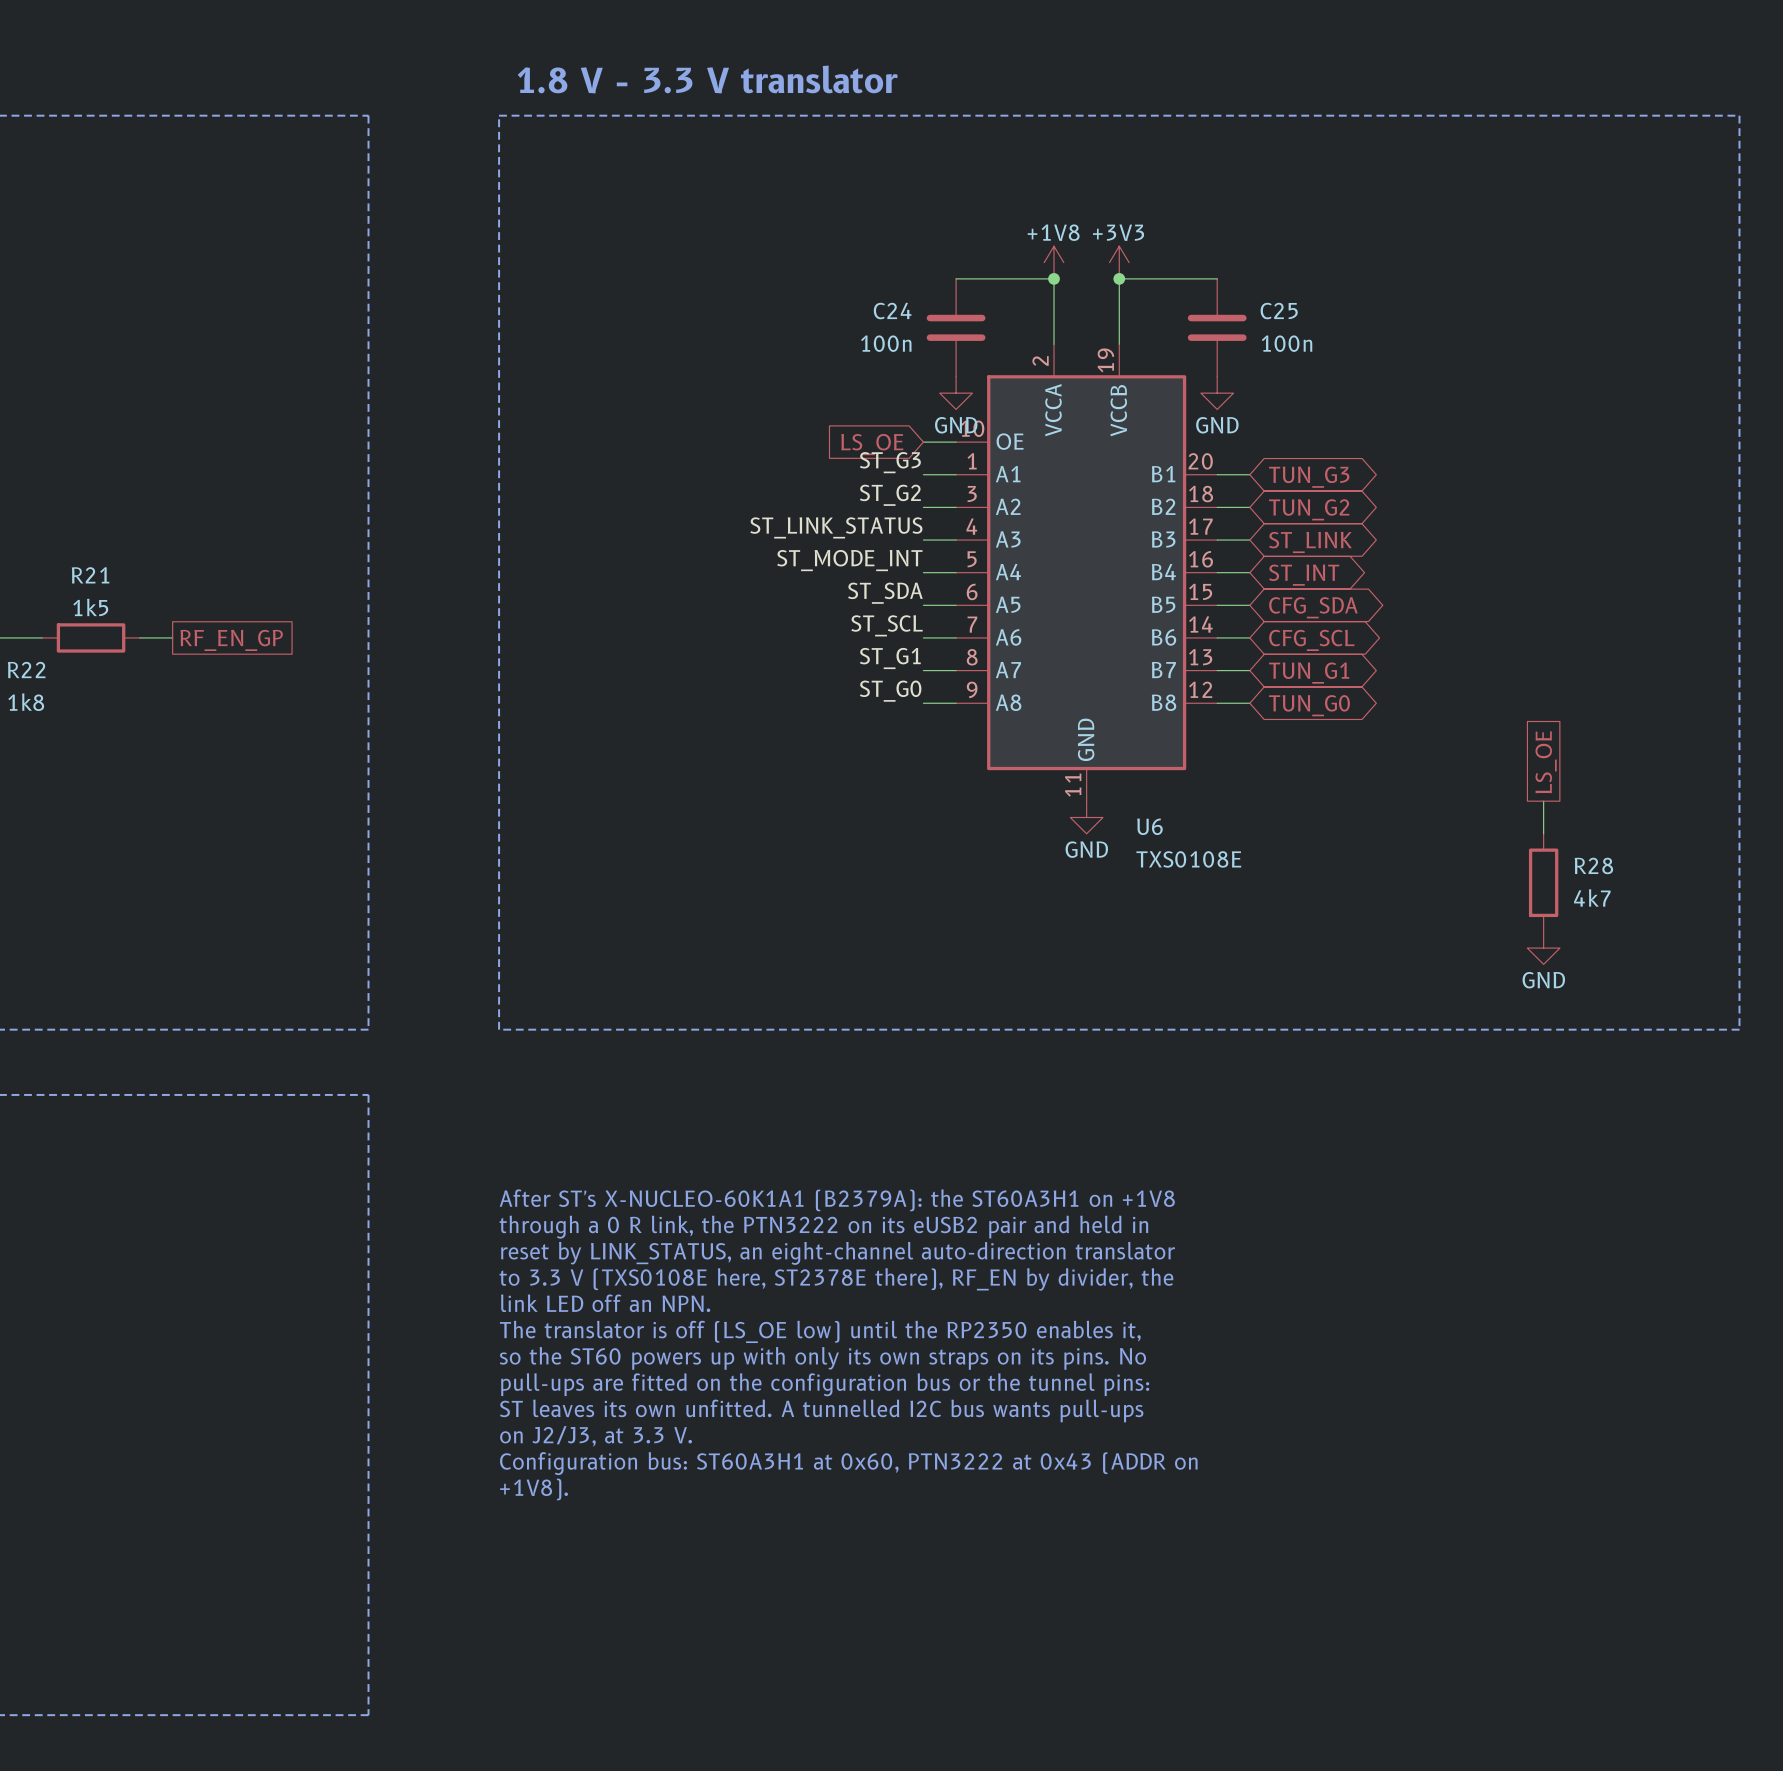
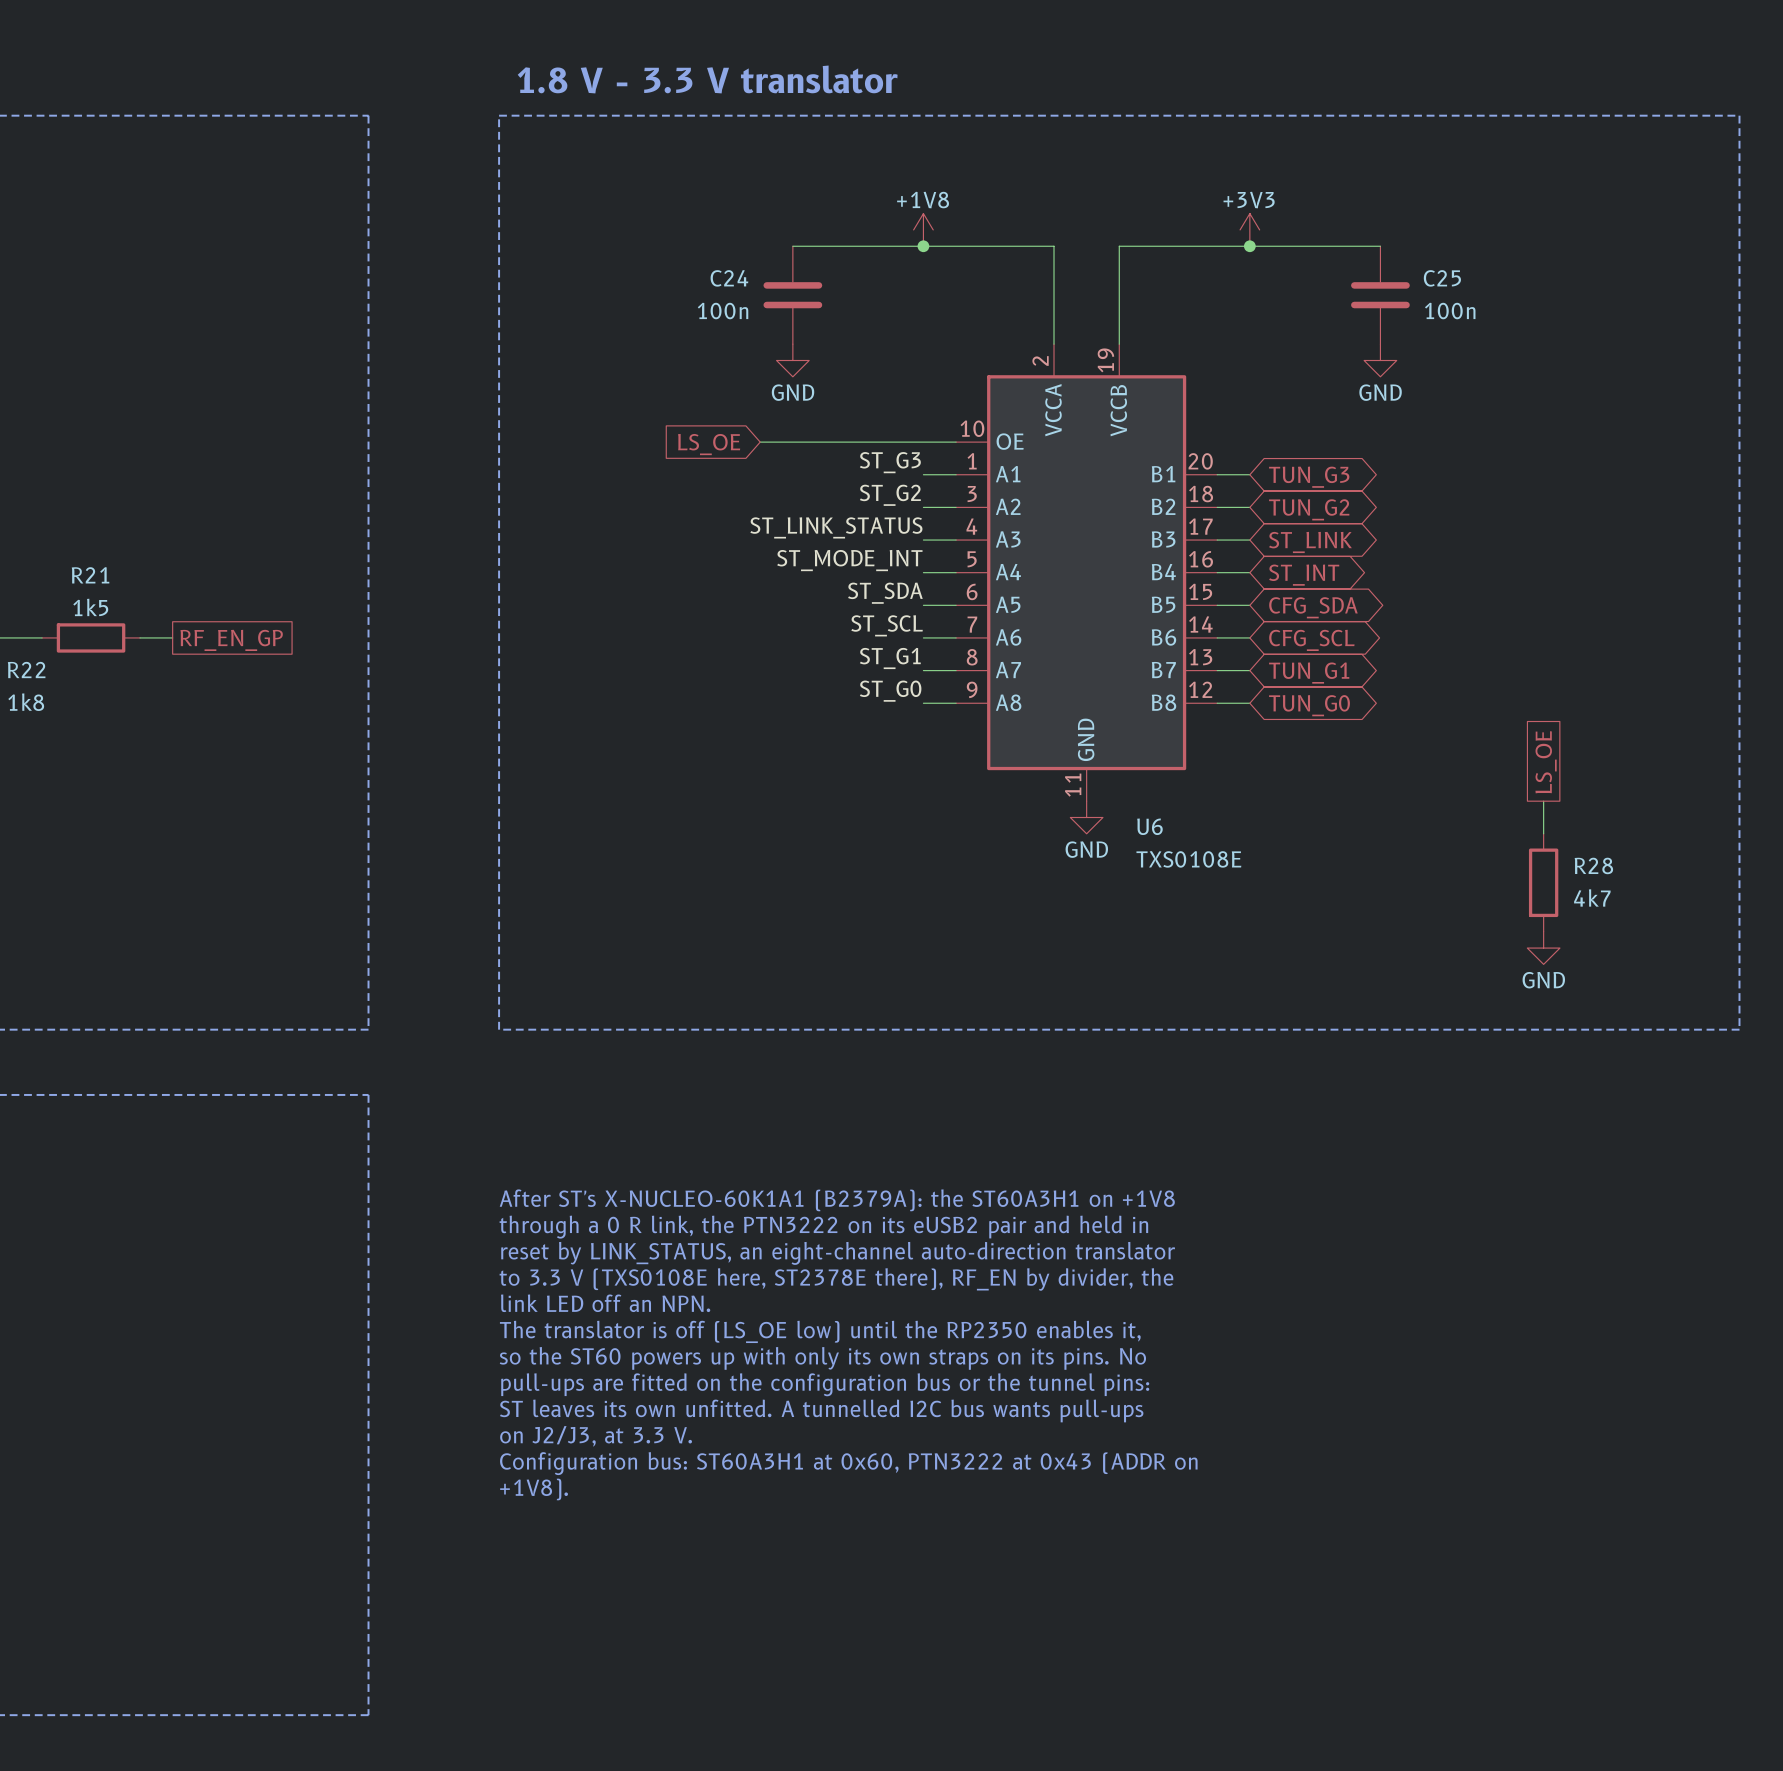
junction: none -> (923, 246)
junction: none -> (1249, 246)
power symbol position: +1V8 (1054, 262) -> +1V8 (923, 229)
power symbol position: +3V3 (1119, 262) -> +3V3 (1249, 229)
wire: (956, 278) (1054, 278) -> (792, 246) (1054, 246) (1054, 278)
junction: (1054, 278) -> none
wire: (1119, 278) (1217, 278) -> (1119, 278) (1119, 246) (1380, 246)
junction: (1119, 278) -> none
C24 position: (956, 327) -> (792, 295)
C25 position: (1217, 327) -> (1380, 295)
power symbol position: GND (956, 393) -> GND (792, 360)
power symbol position: GND (1217, 393) -> GND (1380, 360)
wire: none -> (760, 442) (923, 442)
global label position: LS_OE (872, 444) -> LS_OE (709, 444)

